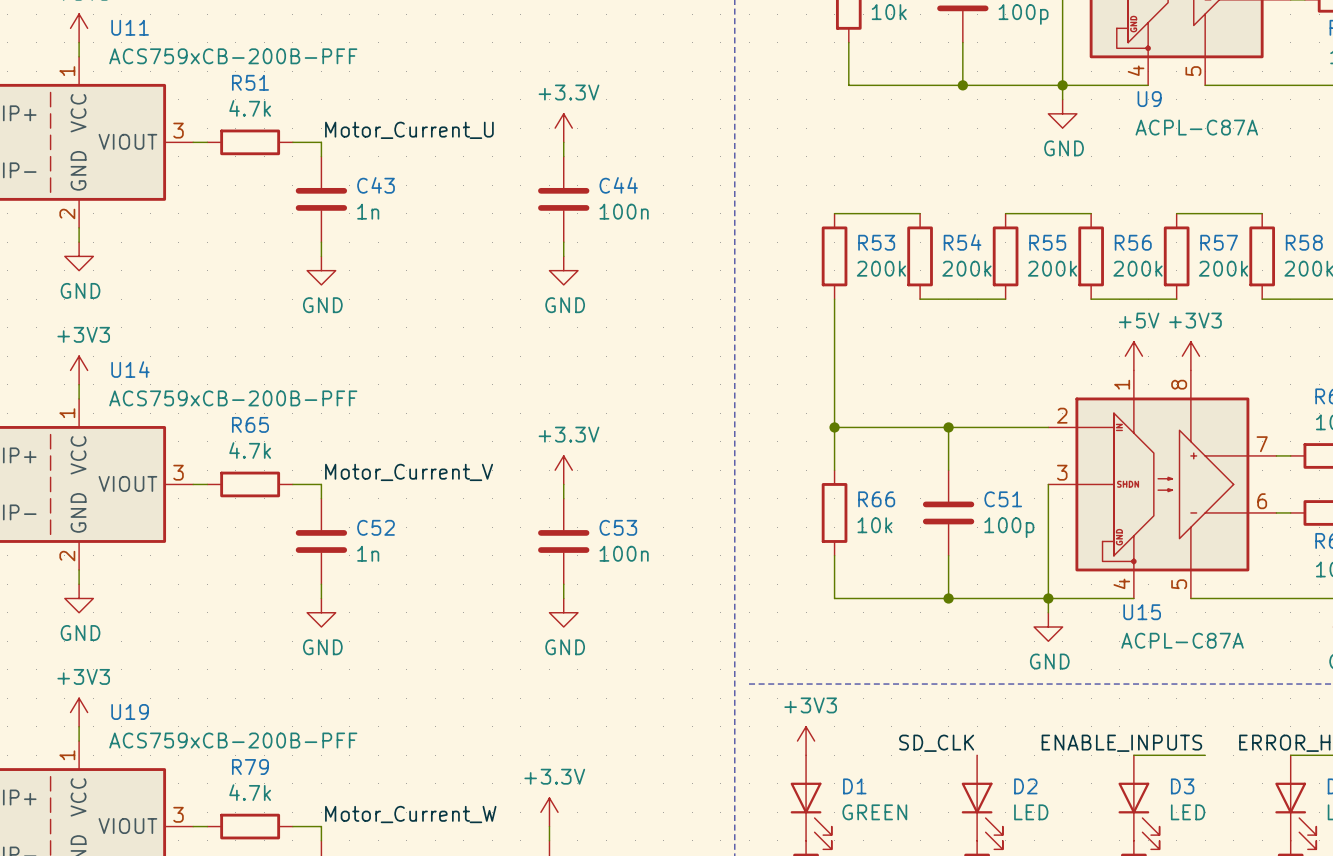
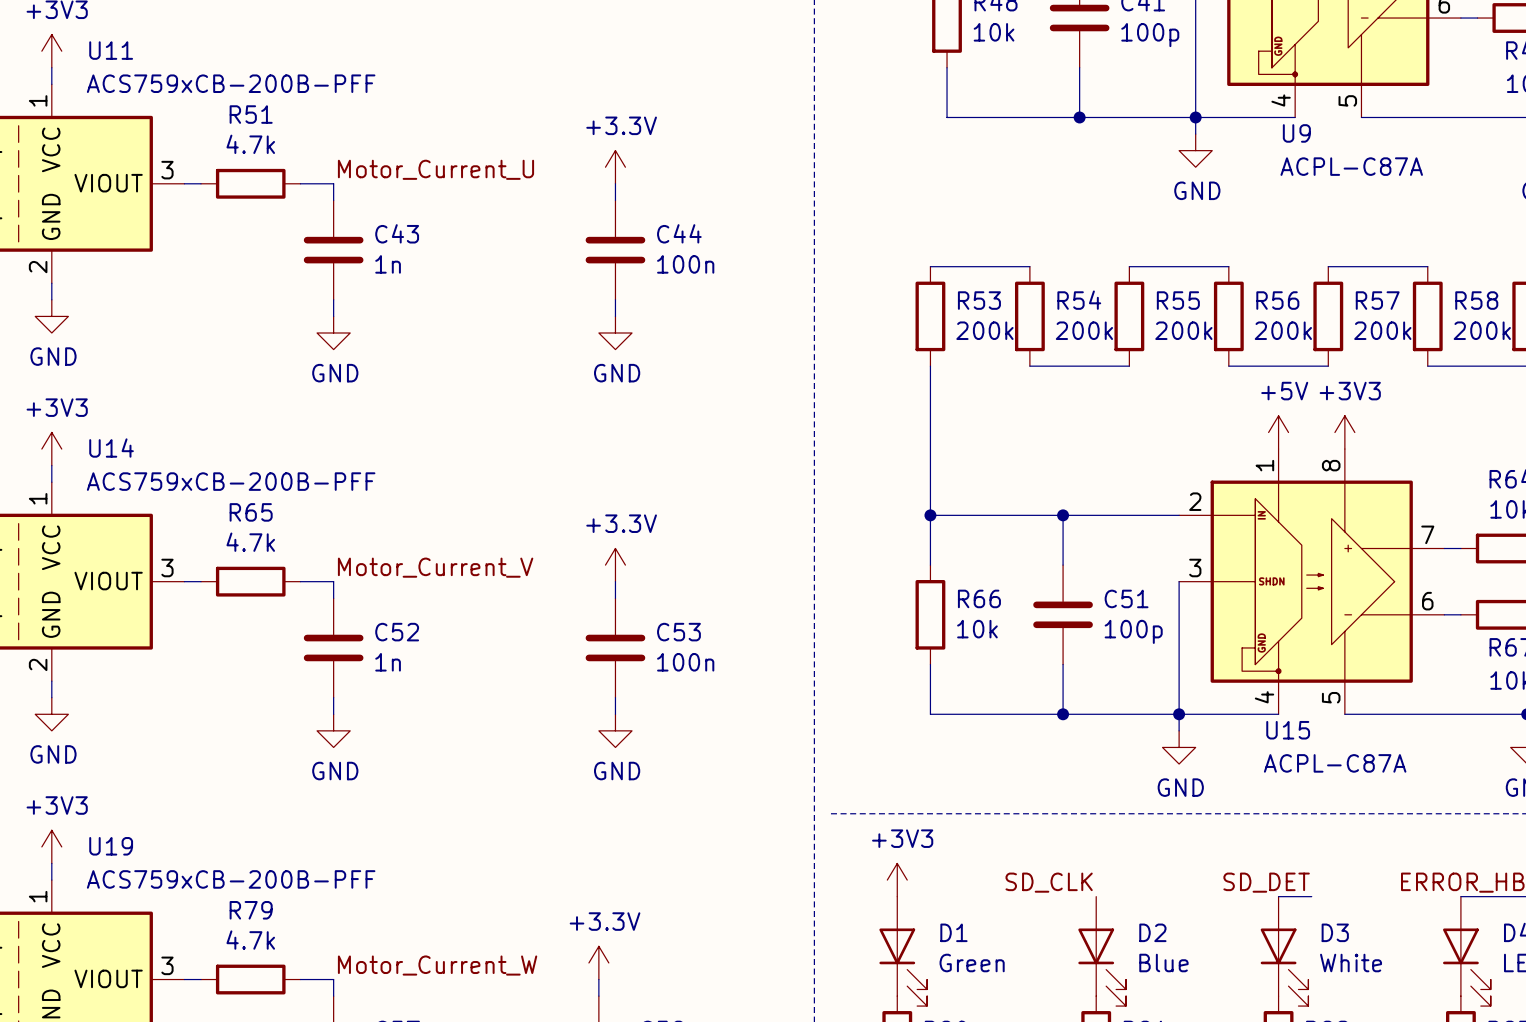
label: ENABLE_INPUTS (1121, 743) -> none
label: none -> SD_DET (1266, 882)
wire: (1162, 755) (1205, 755) -> none
D1 value: GREEN (874, 812) -> Green (972, 963)
D2 value: LED (1031, 812) -> Blue (1163, 963)
D3 value: LED (1188, 812) -> White (1351, 963)

